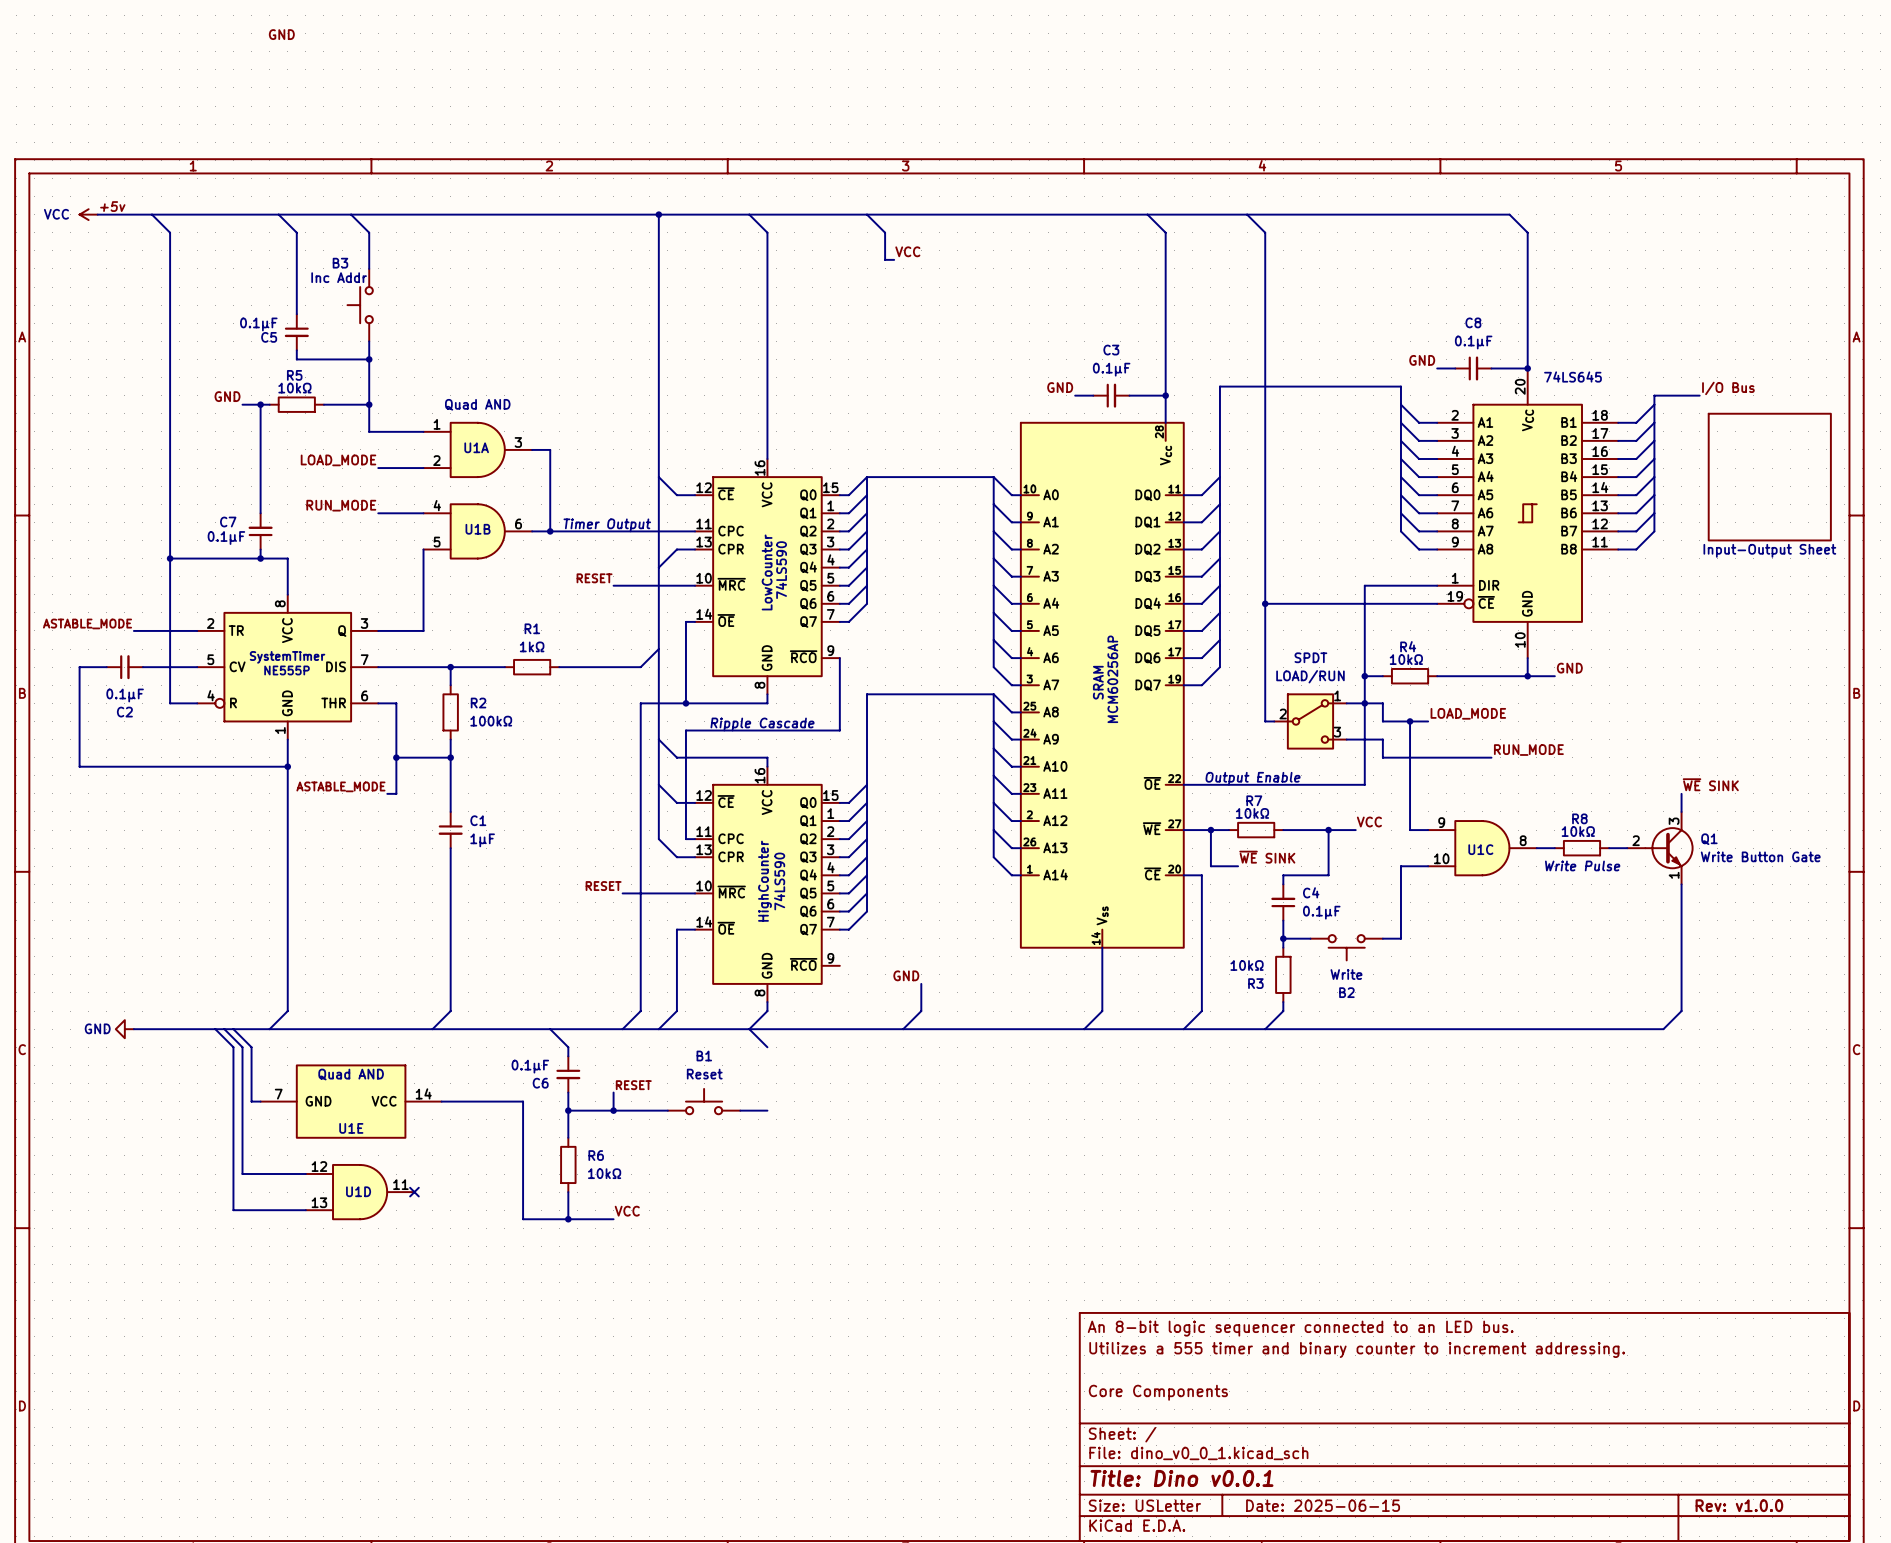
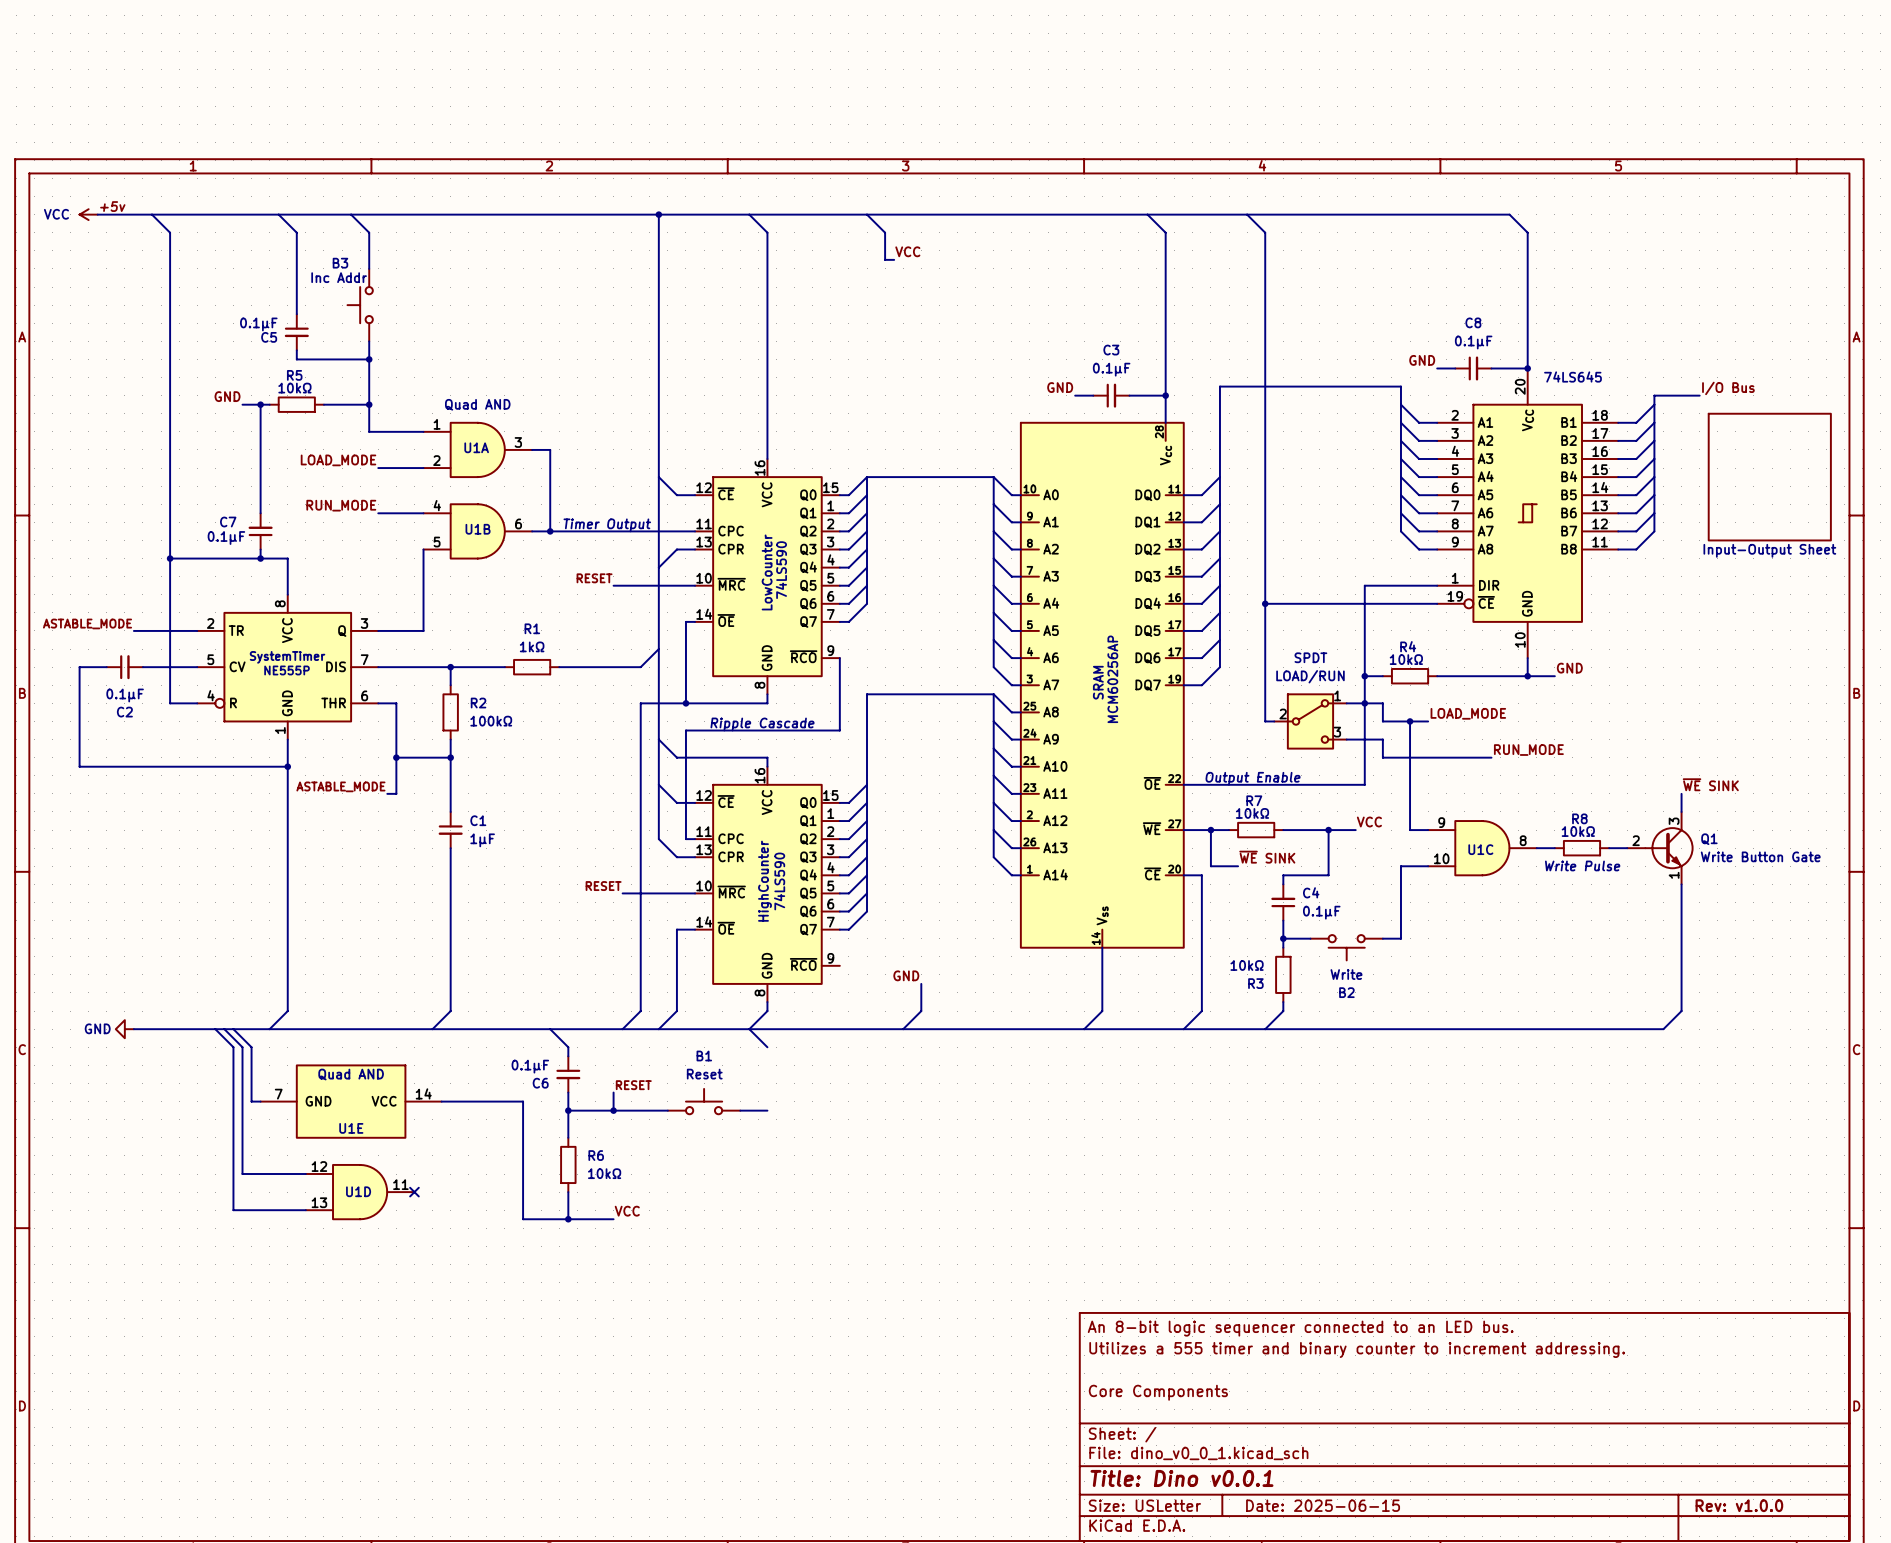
label: GND (281, 34) -> none

